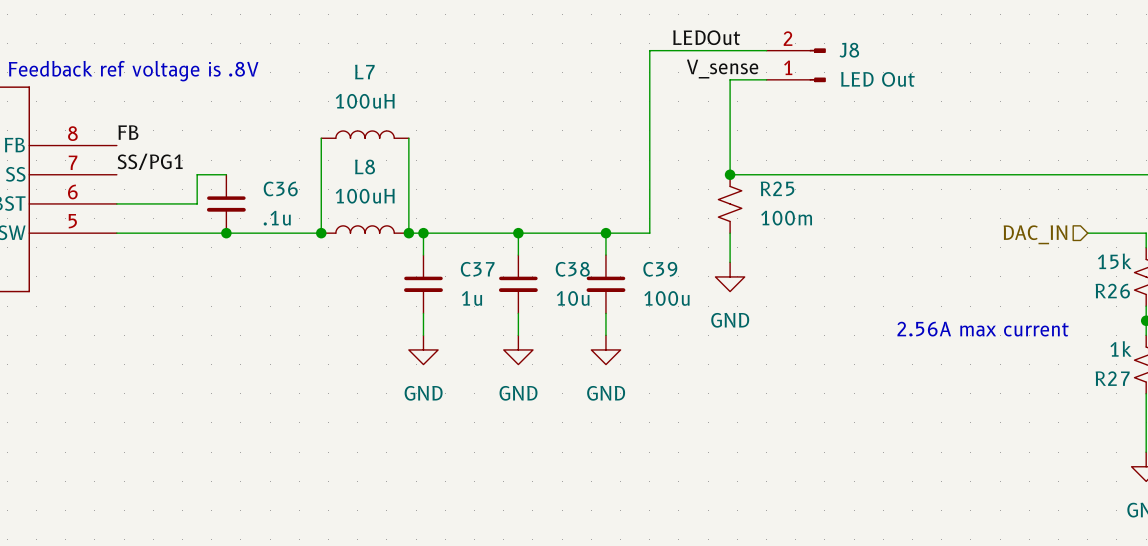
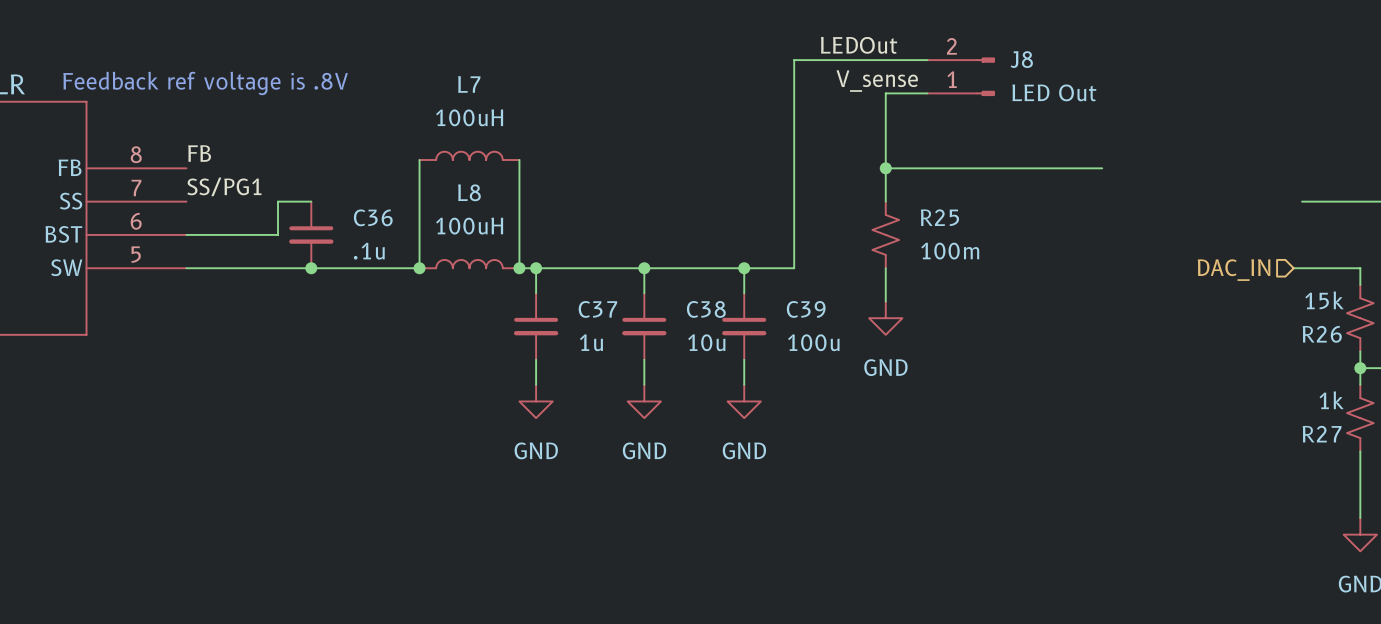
wire: none -> (885, 168) (1102, 168)
wire: (730, 174) (1095, 174) -> none
junction position: (730, 174) -> (885, 168)
text: 2.56A max current (983, 329) -> none

